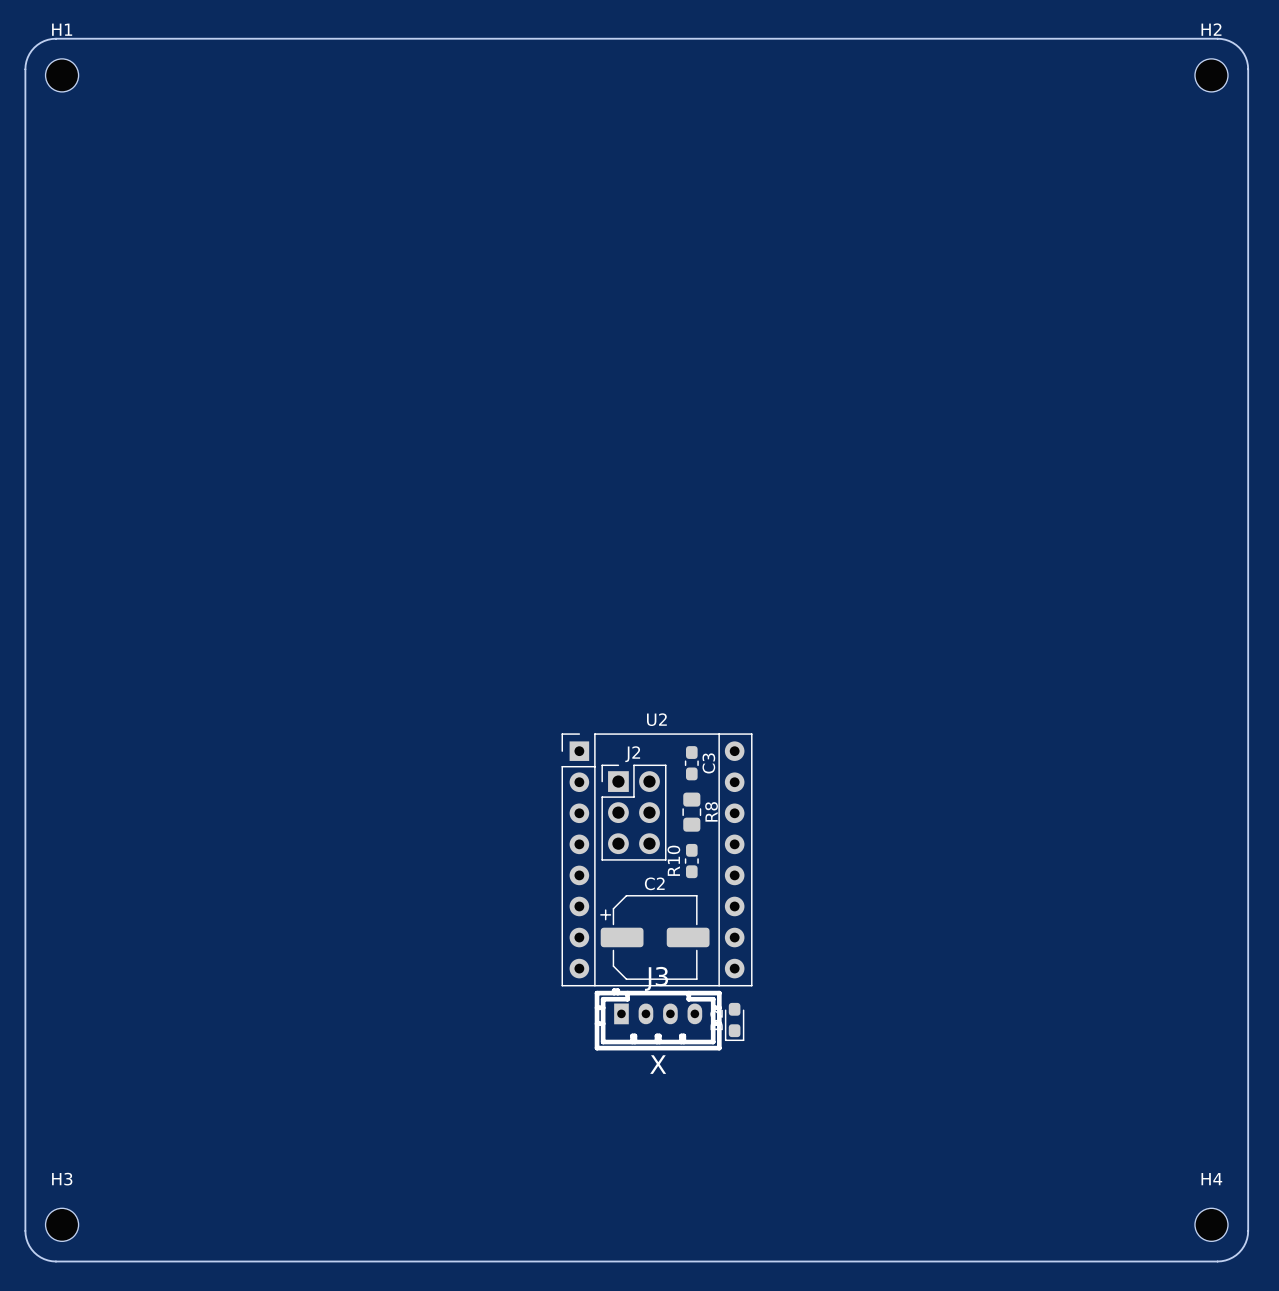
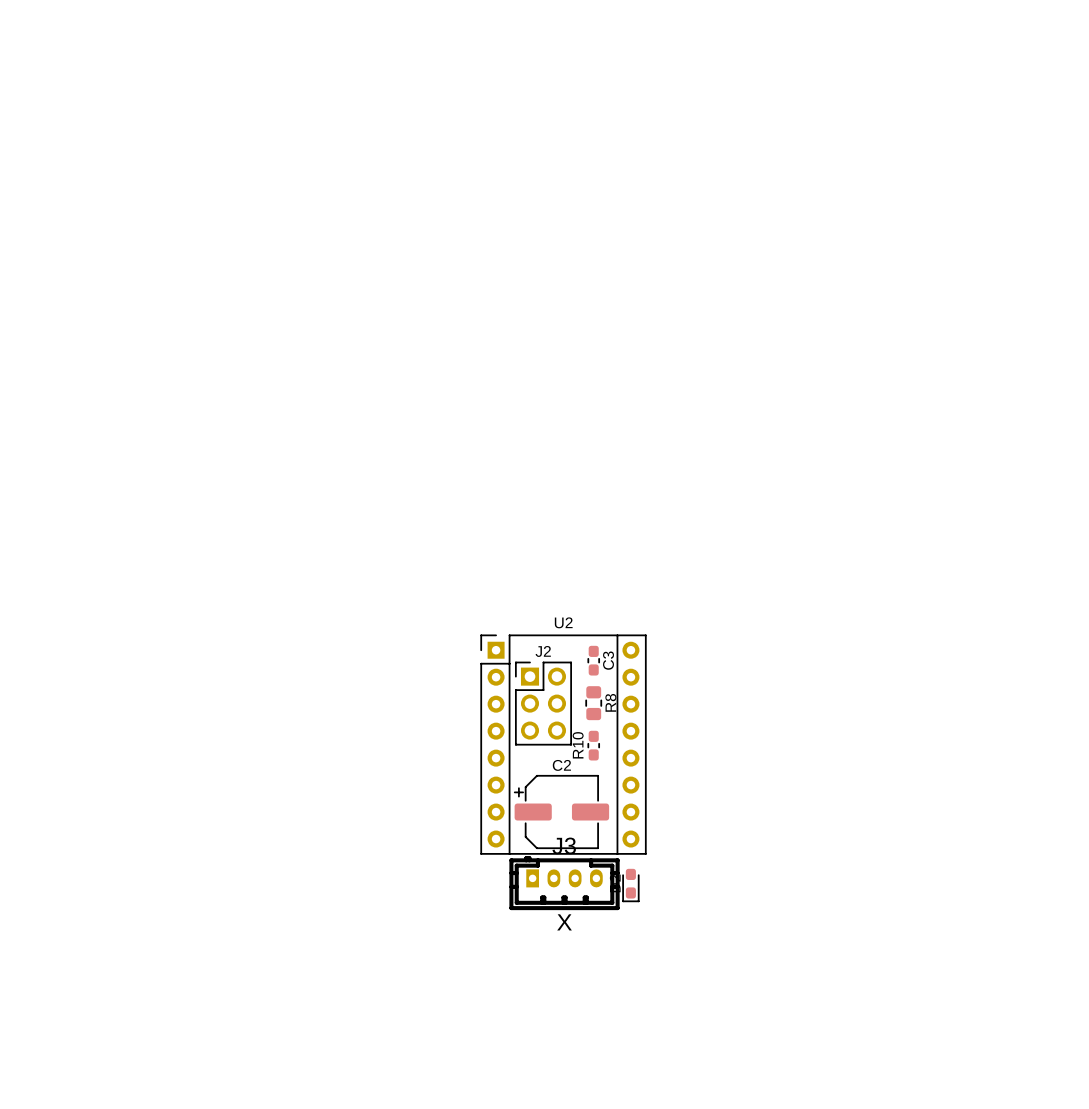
board edge: (55, 38) (1217, 38) (1229, 41) (1239, 47) (1245, 57) (1248, 69) (1248, 1230) (1245, 1242) (1239, 1252) (1229, 1259) (1217, 1261) (55, 1261) (44, 1259) (34, 1252) (27, 1242) (25, 1230) (25, 69) (27, 57) (34, 47) (44, 41) (55, 38) -> none
H1: (62, 75) -> none
H2: (1211, 75) -> none
H3: (62, 1224) -> none
H4: (1211, 1224) -> none

